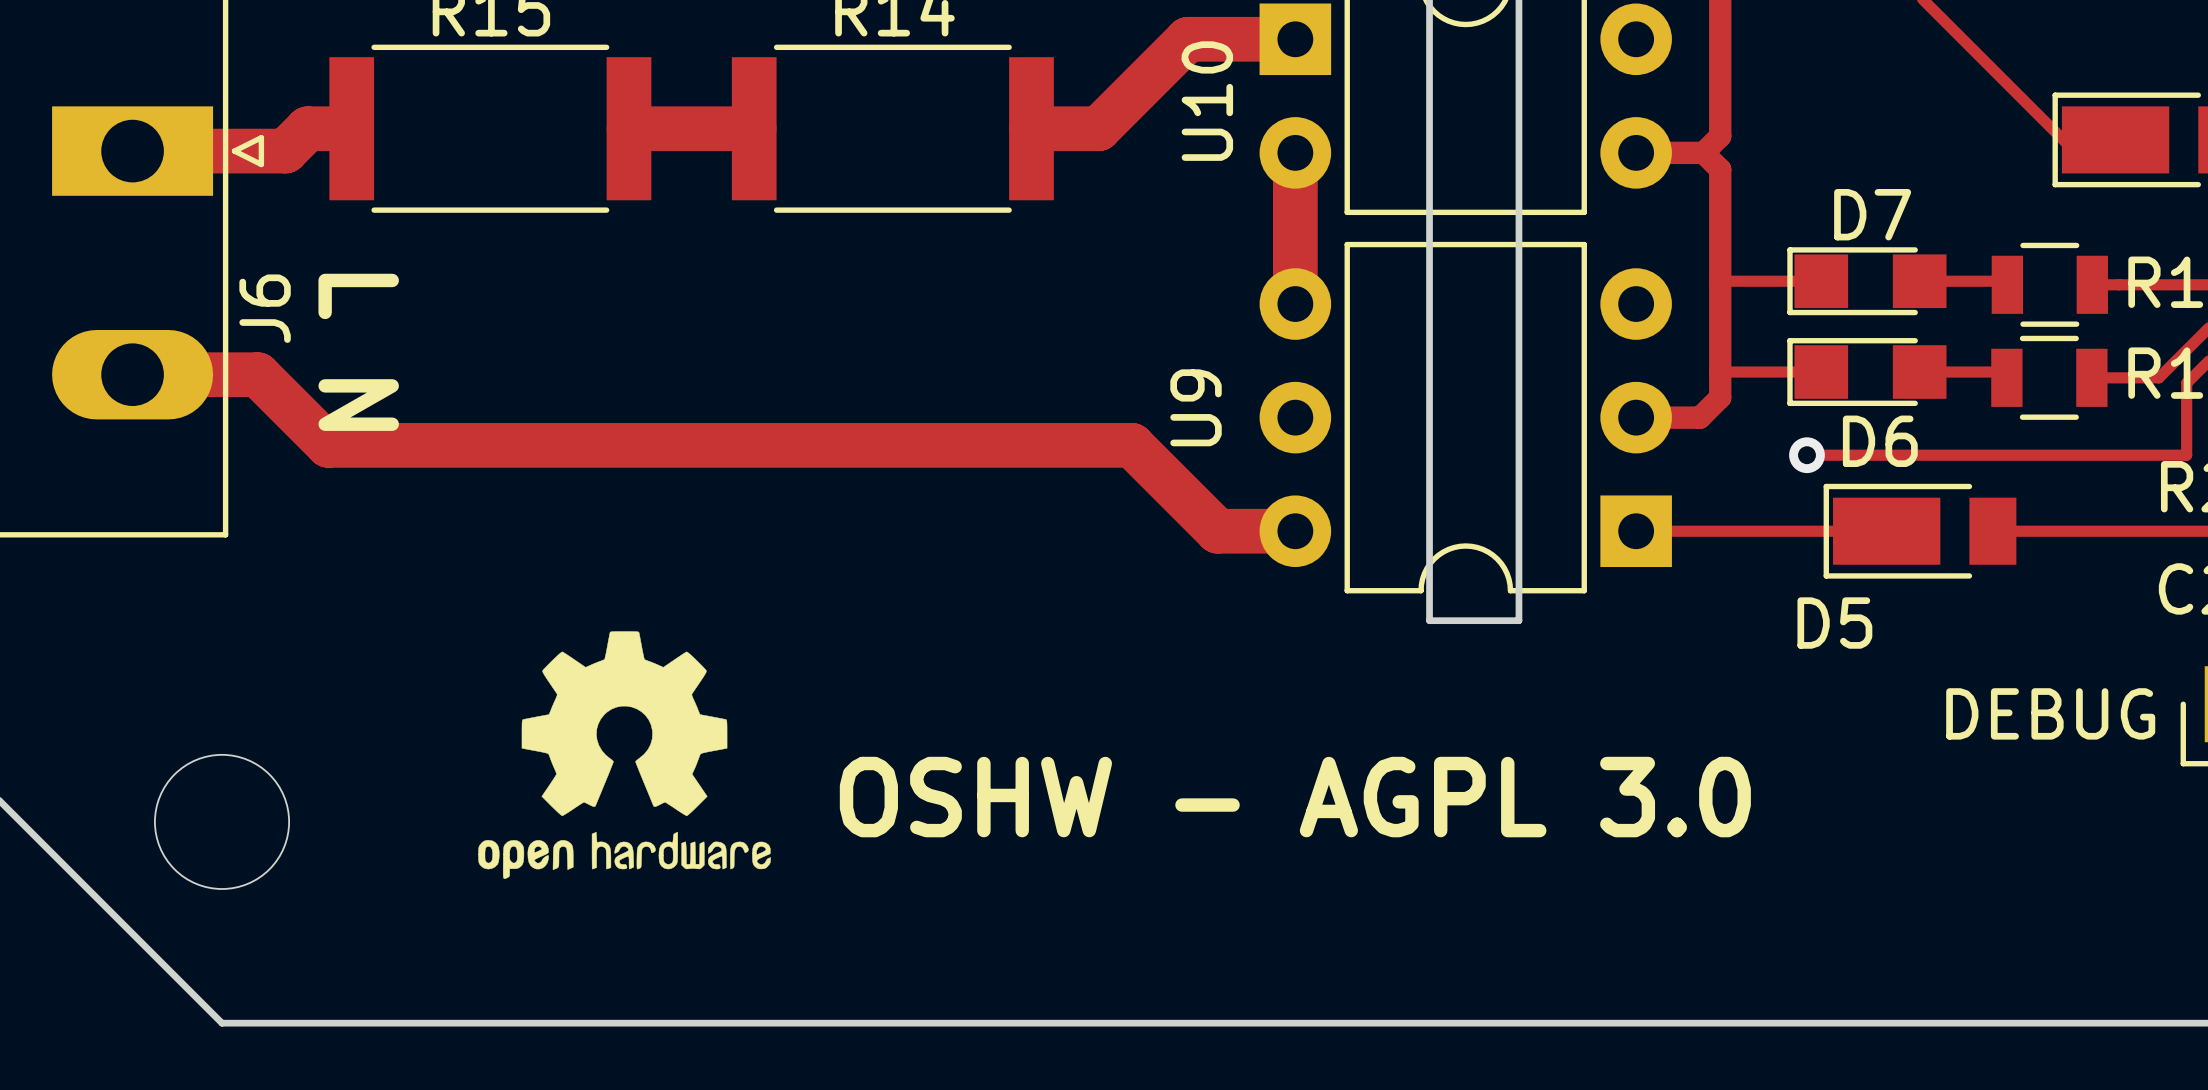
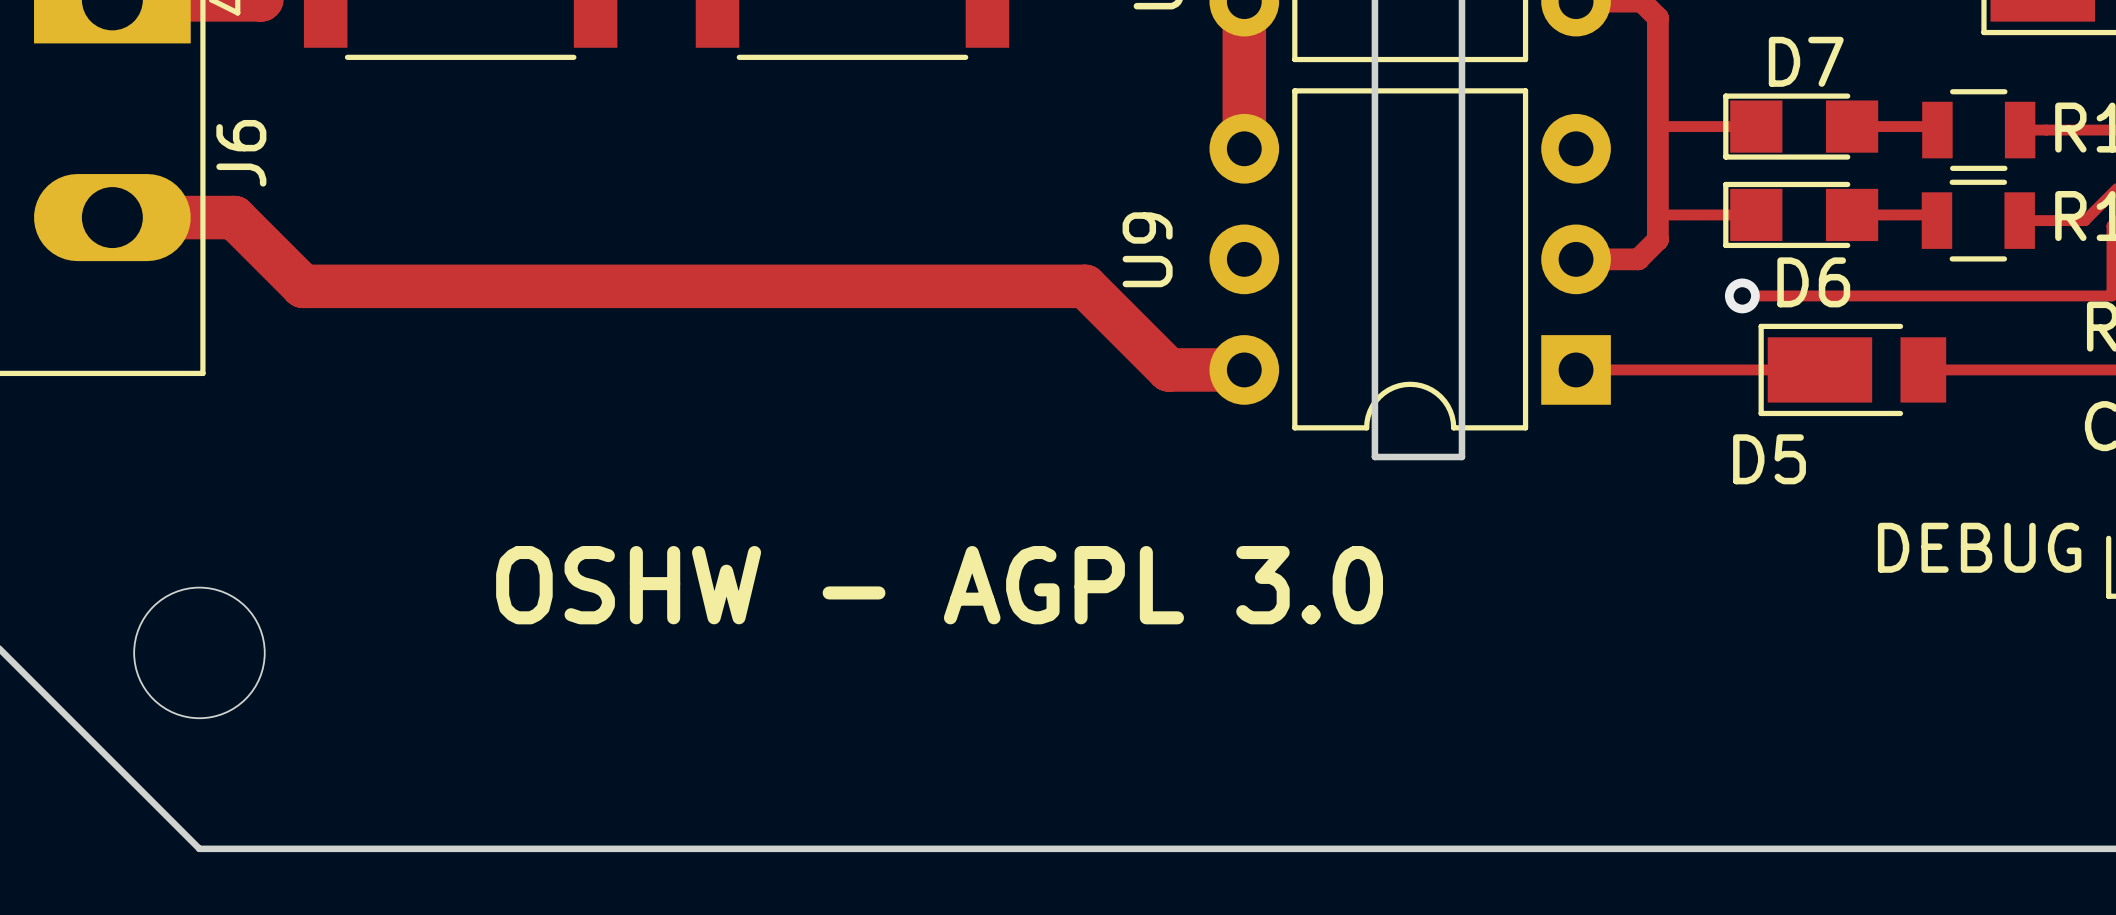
text: L N (358, 352) -> none
drawing: [478, 631, 771, 880] -> none
text position: OSHW - AGPL 3.0 (1295, 797) -> OSHW - AGPL 3.0 (939, 585)

